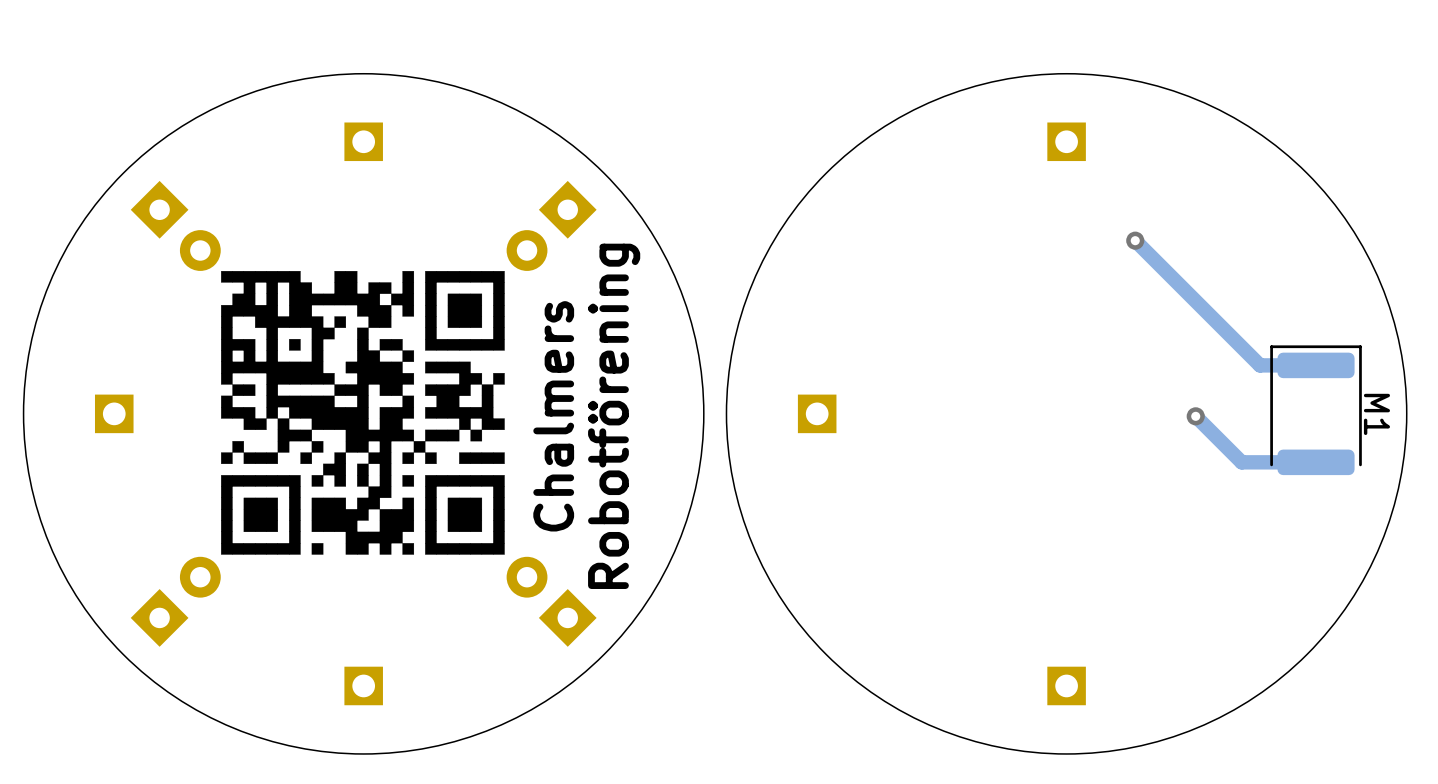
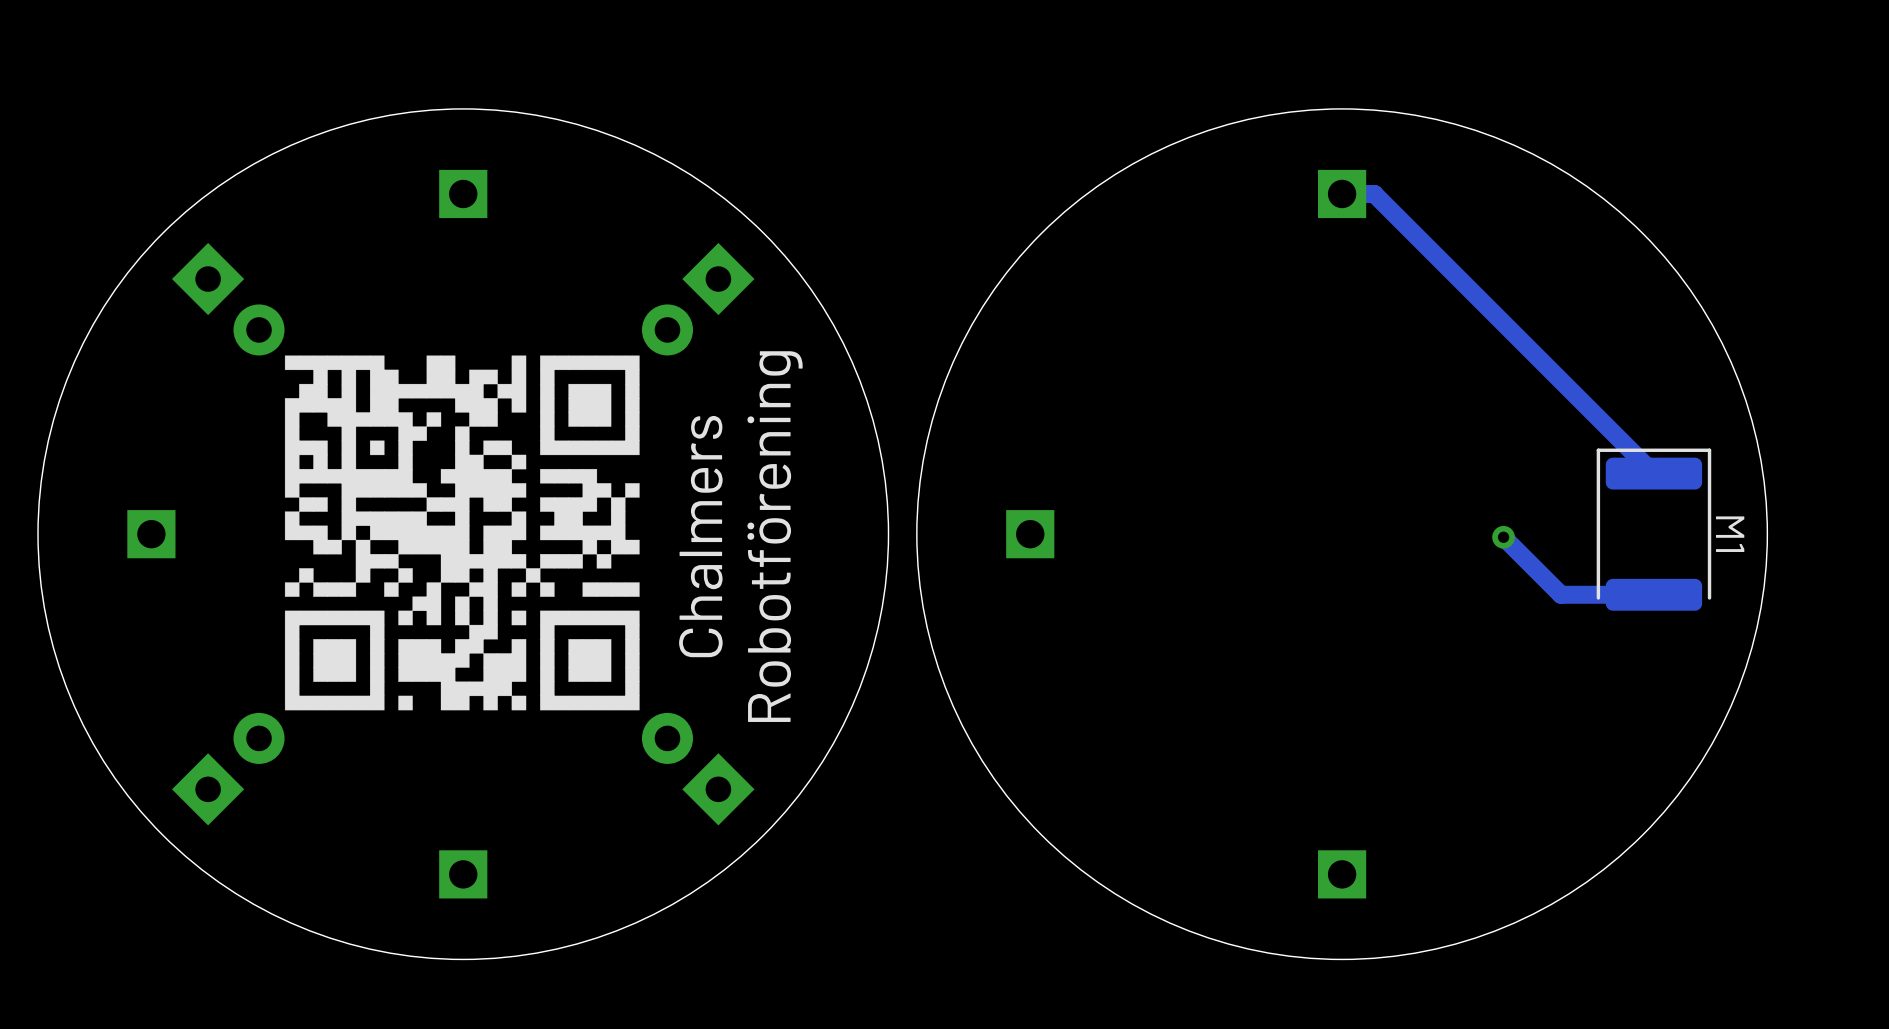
track: (1135, 240) (1259, 365) (1316, 365) -> (1342, 193) (1374, 193) (1653, 473)
via: (1135, 240) -> none

